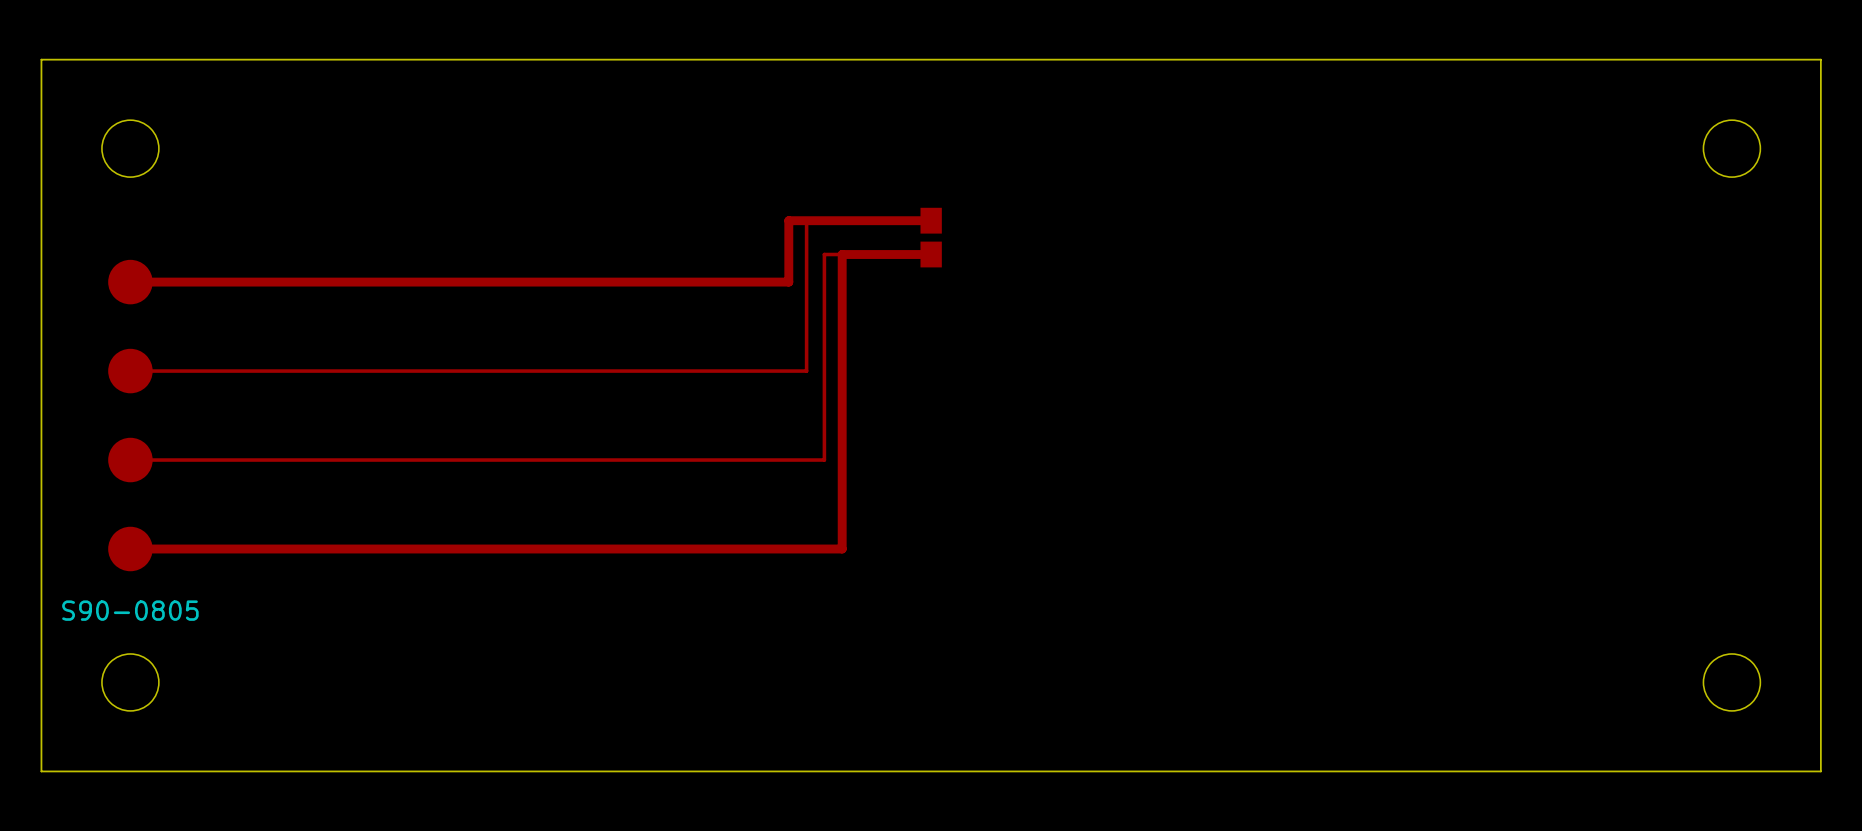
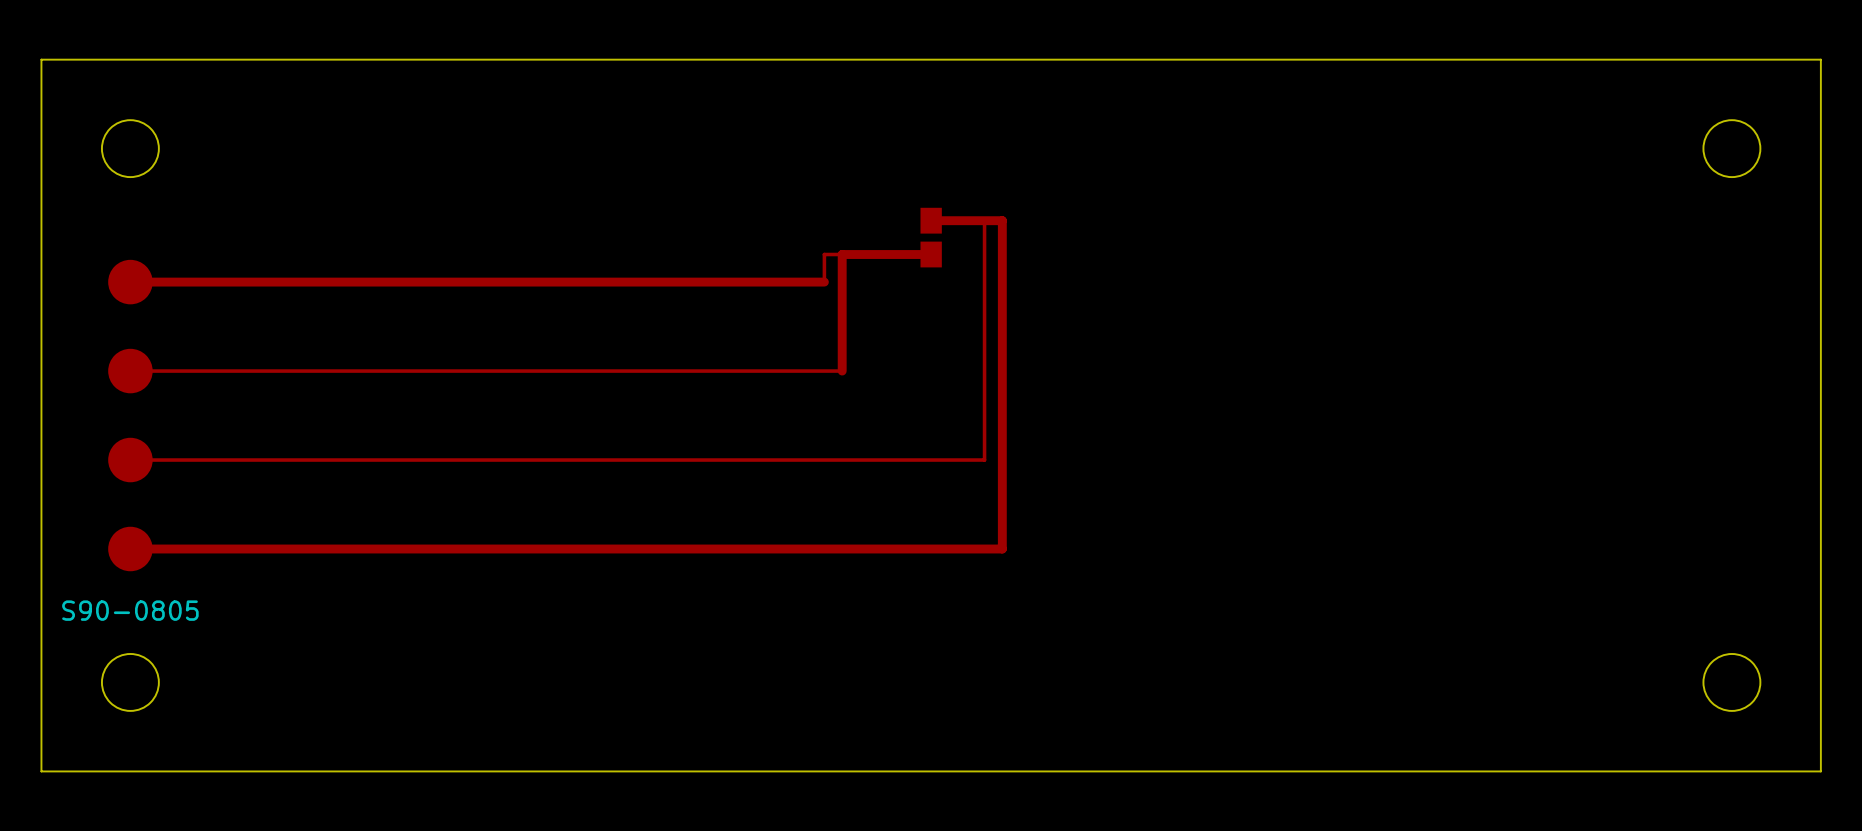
top track: (788, 282) (788, 220) (931, 220) (806, 220) (806, 371) -> (788, 282) (824, 282)
top track: (824, 282) (824, 460) -> none
top track: none -> (806, 371) (842, 371)
top track: (842, 371) (842, 549) -> (824, 460) (984, 460) (984, 220) (931, 220) (1002, 220) (1002, 549) (842, 549)

